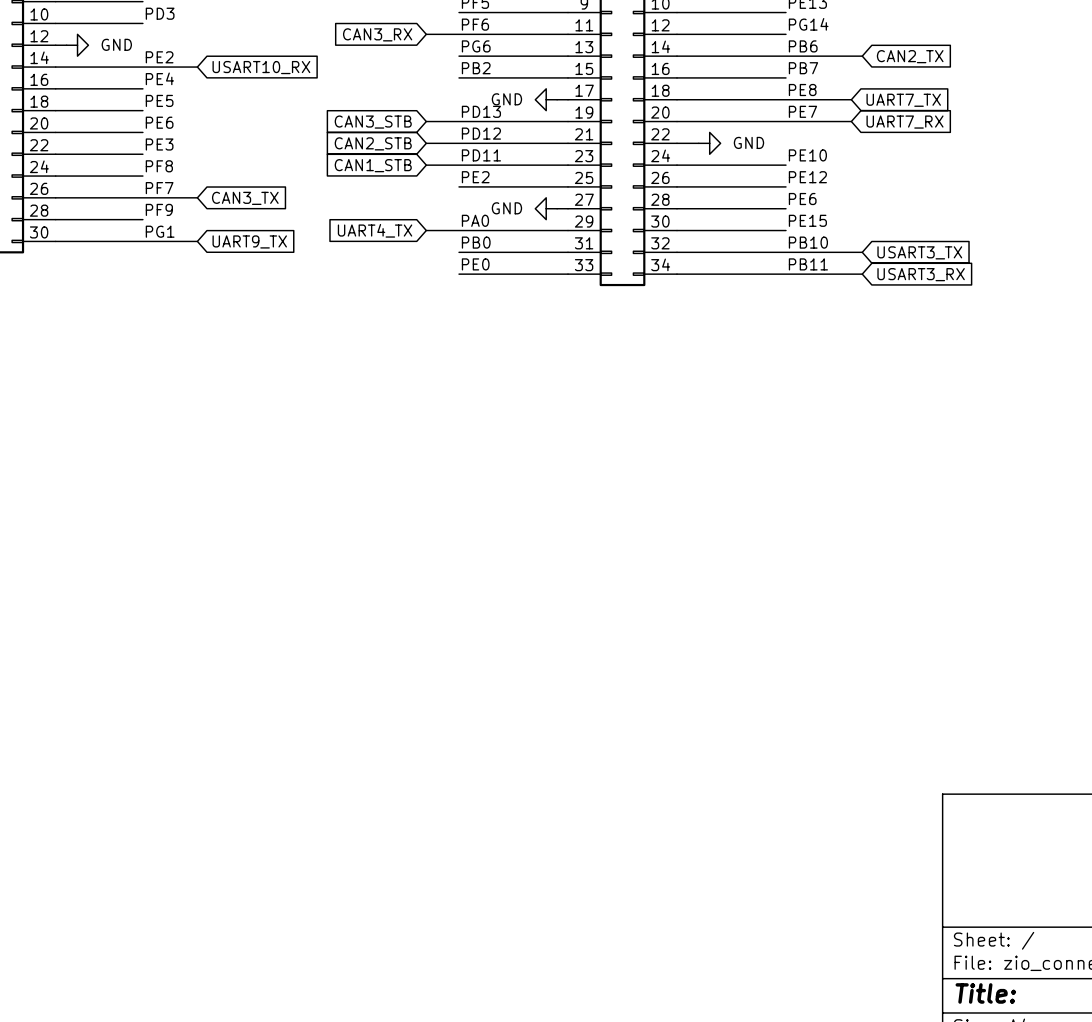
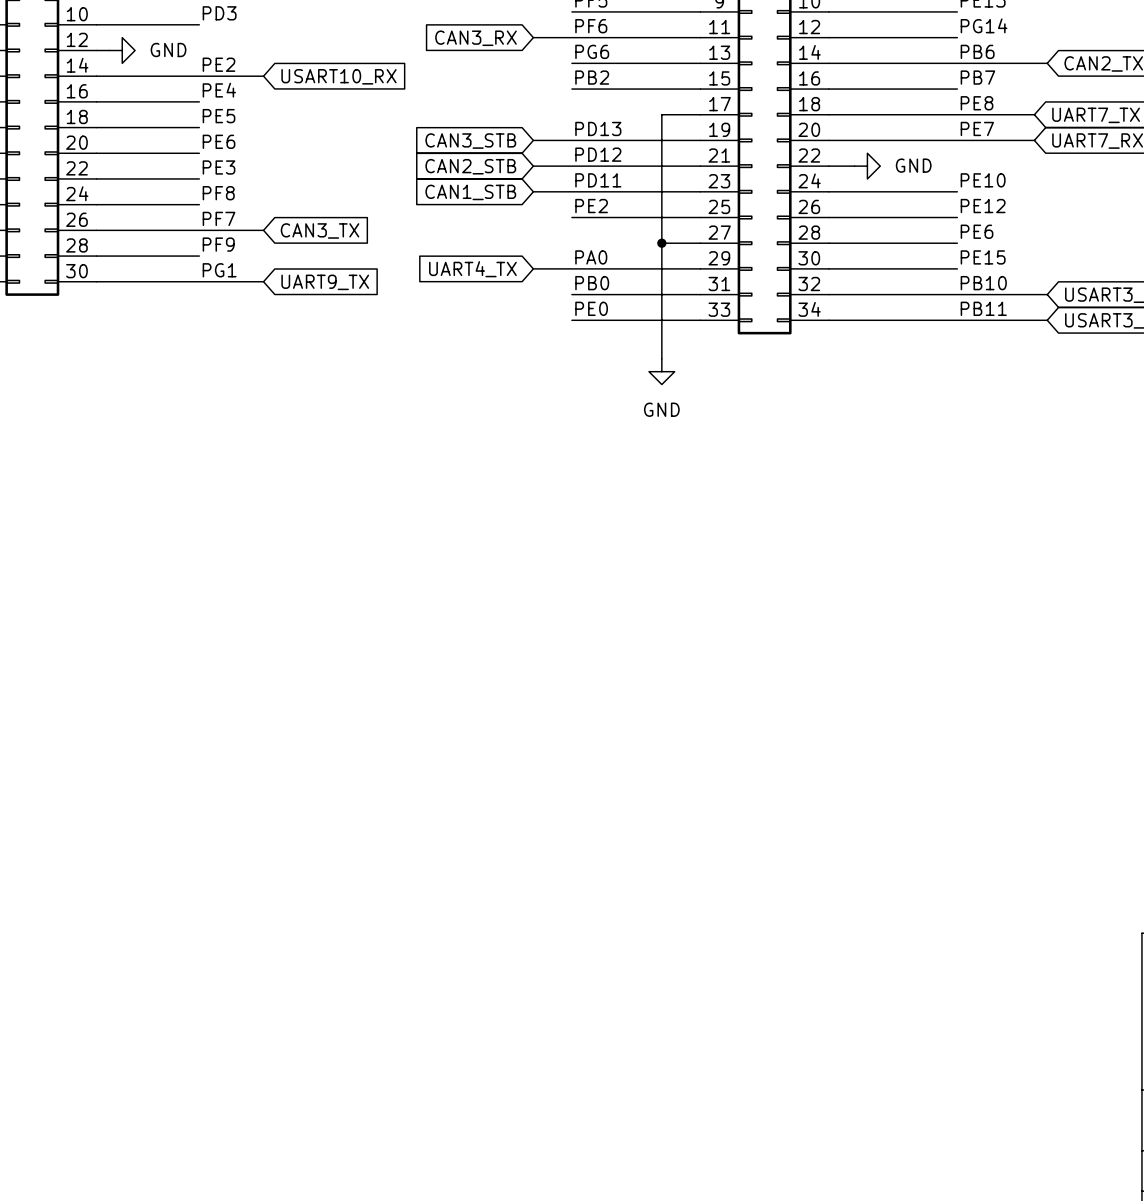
power symbol: GND (546, 99) -> none
wire: none -> (687, 114) (661, 114) (661, 358)
junction: none -> (661, 243)
power symbol: GND (546, 208) -> none
power symbol: none -> GND (661, 371)

